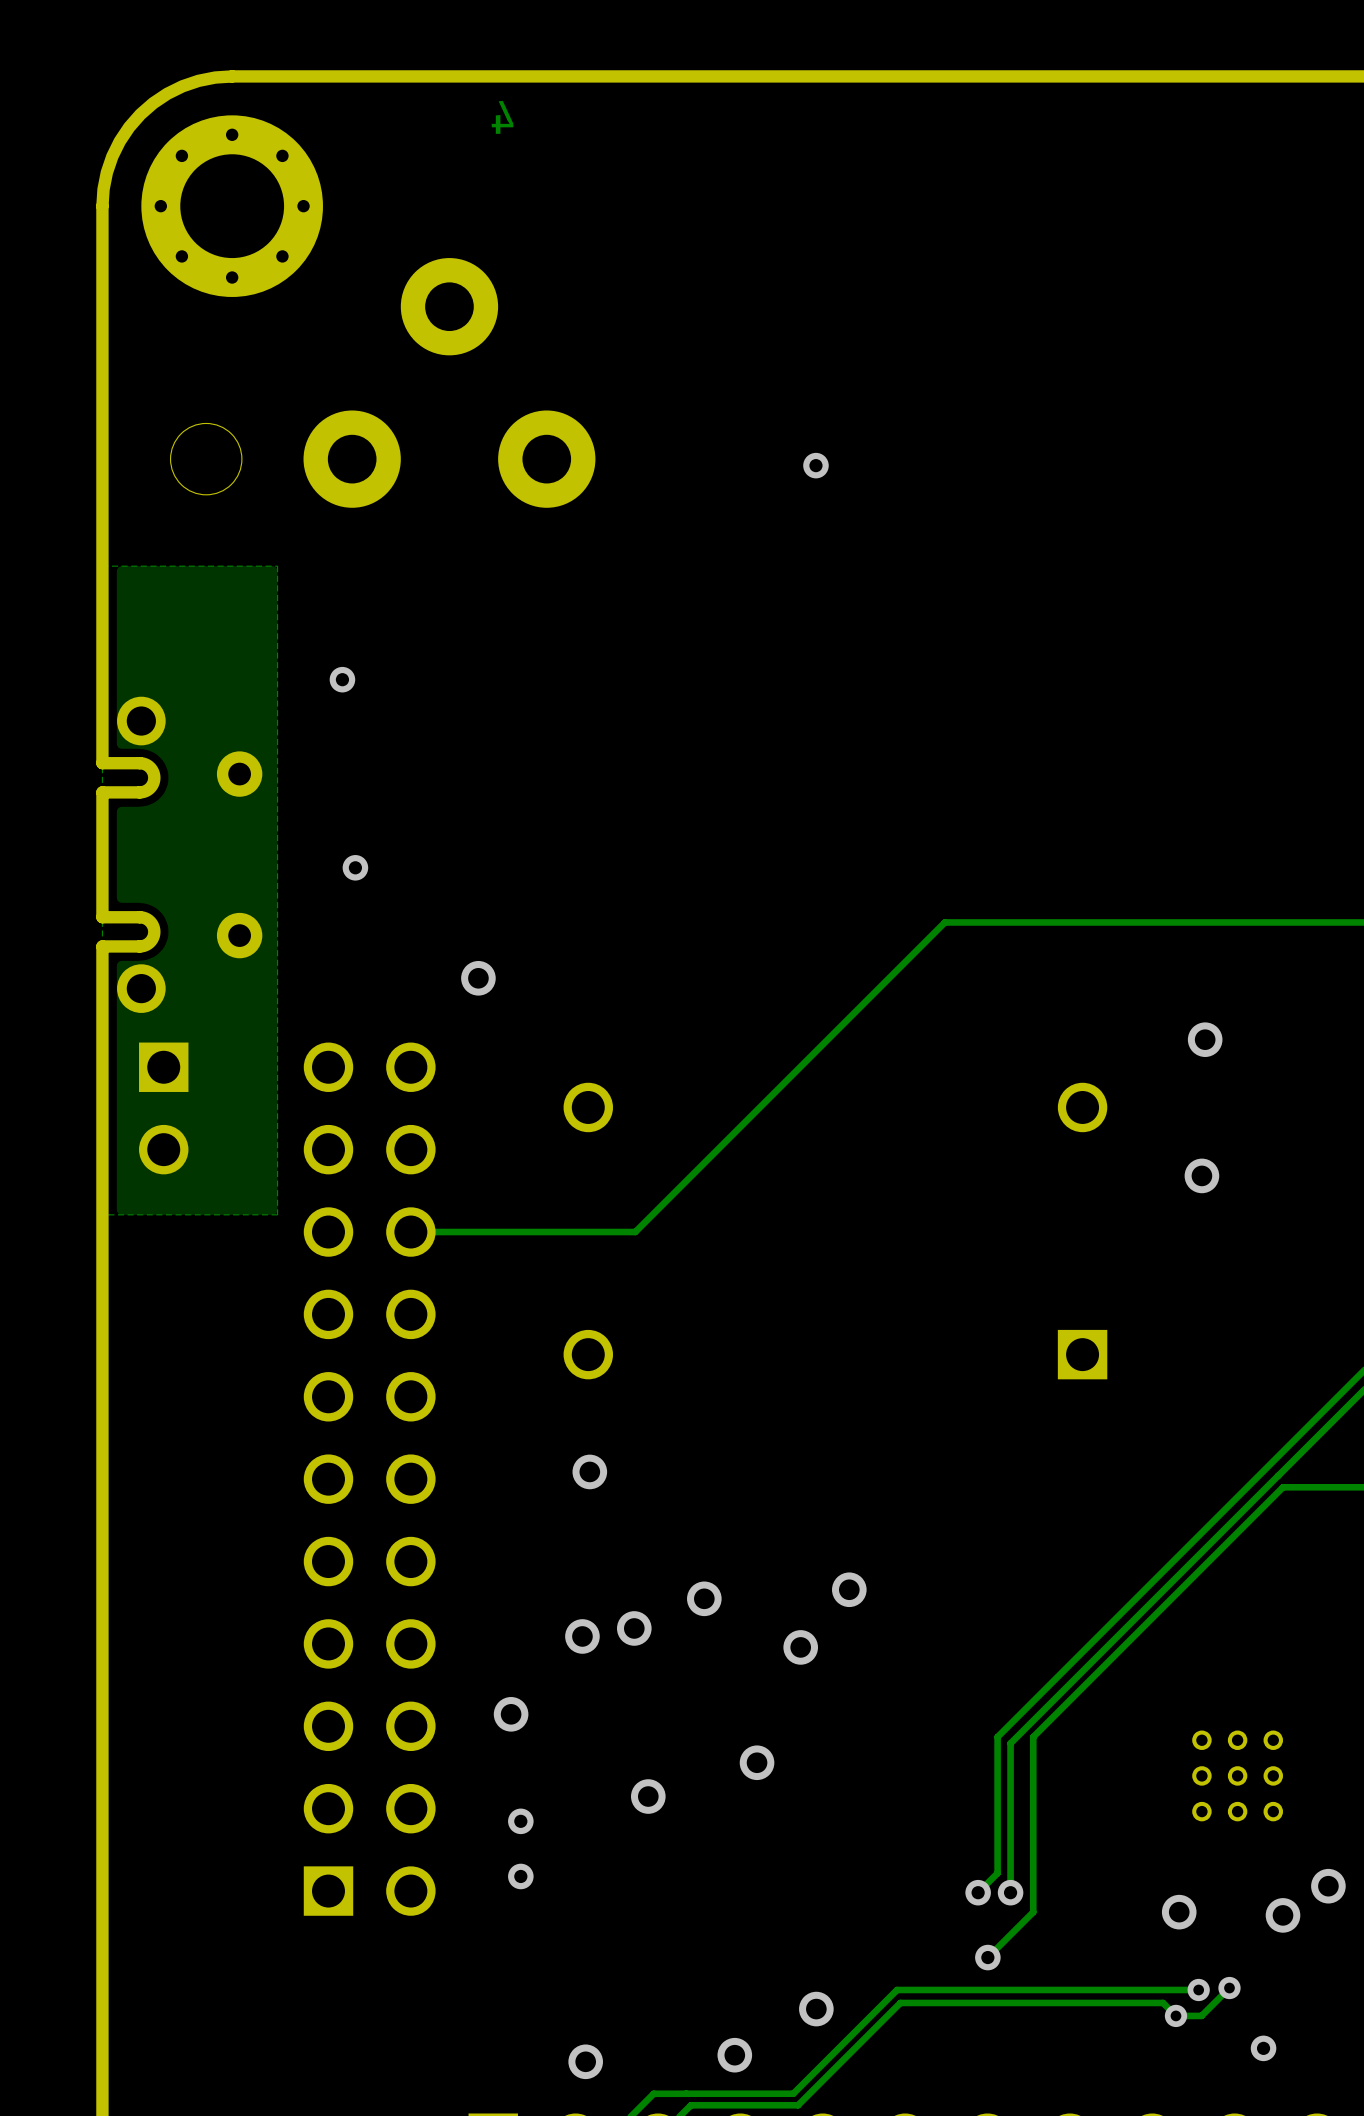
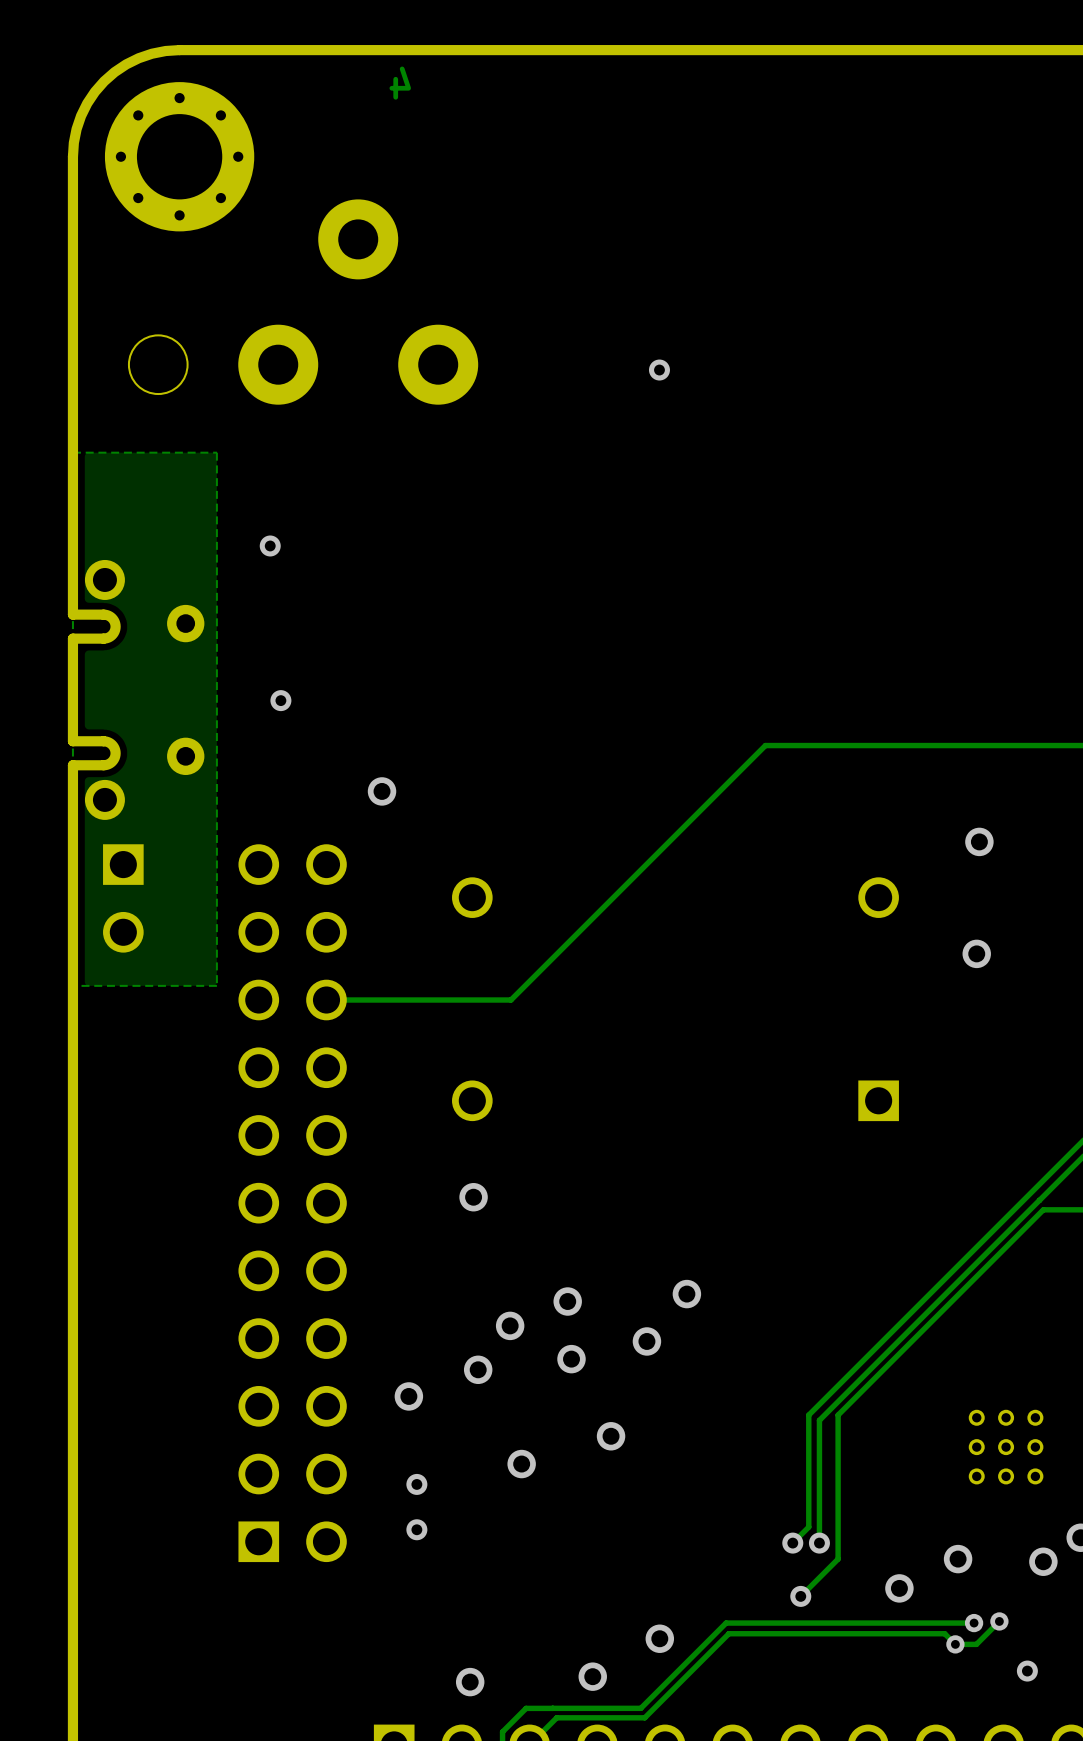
via position: (582, 1636) -> (478, 1369)
via: none -> (571, 1359)
via: none -> (899, 1588)

